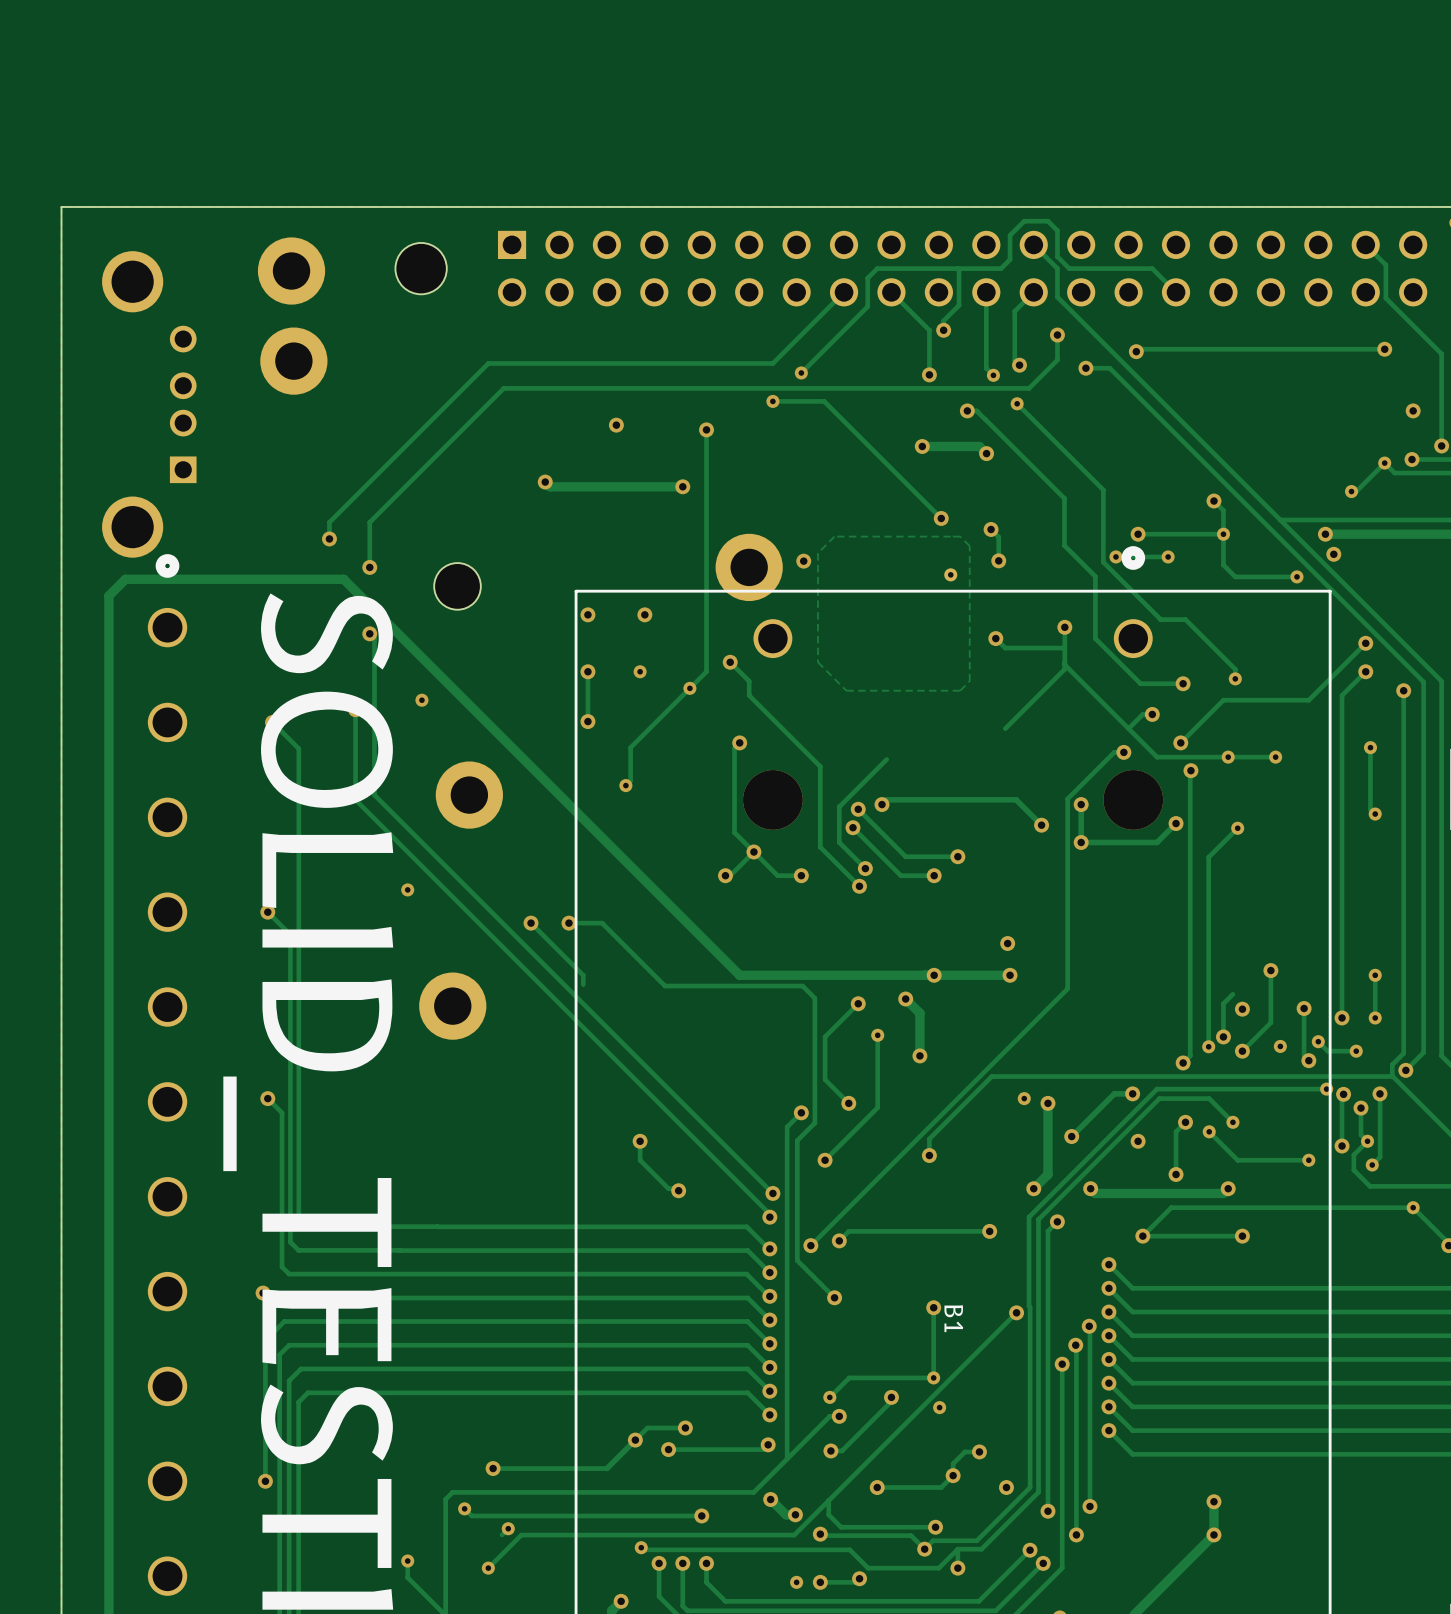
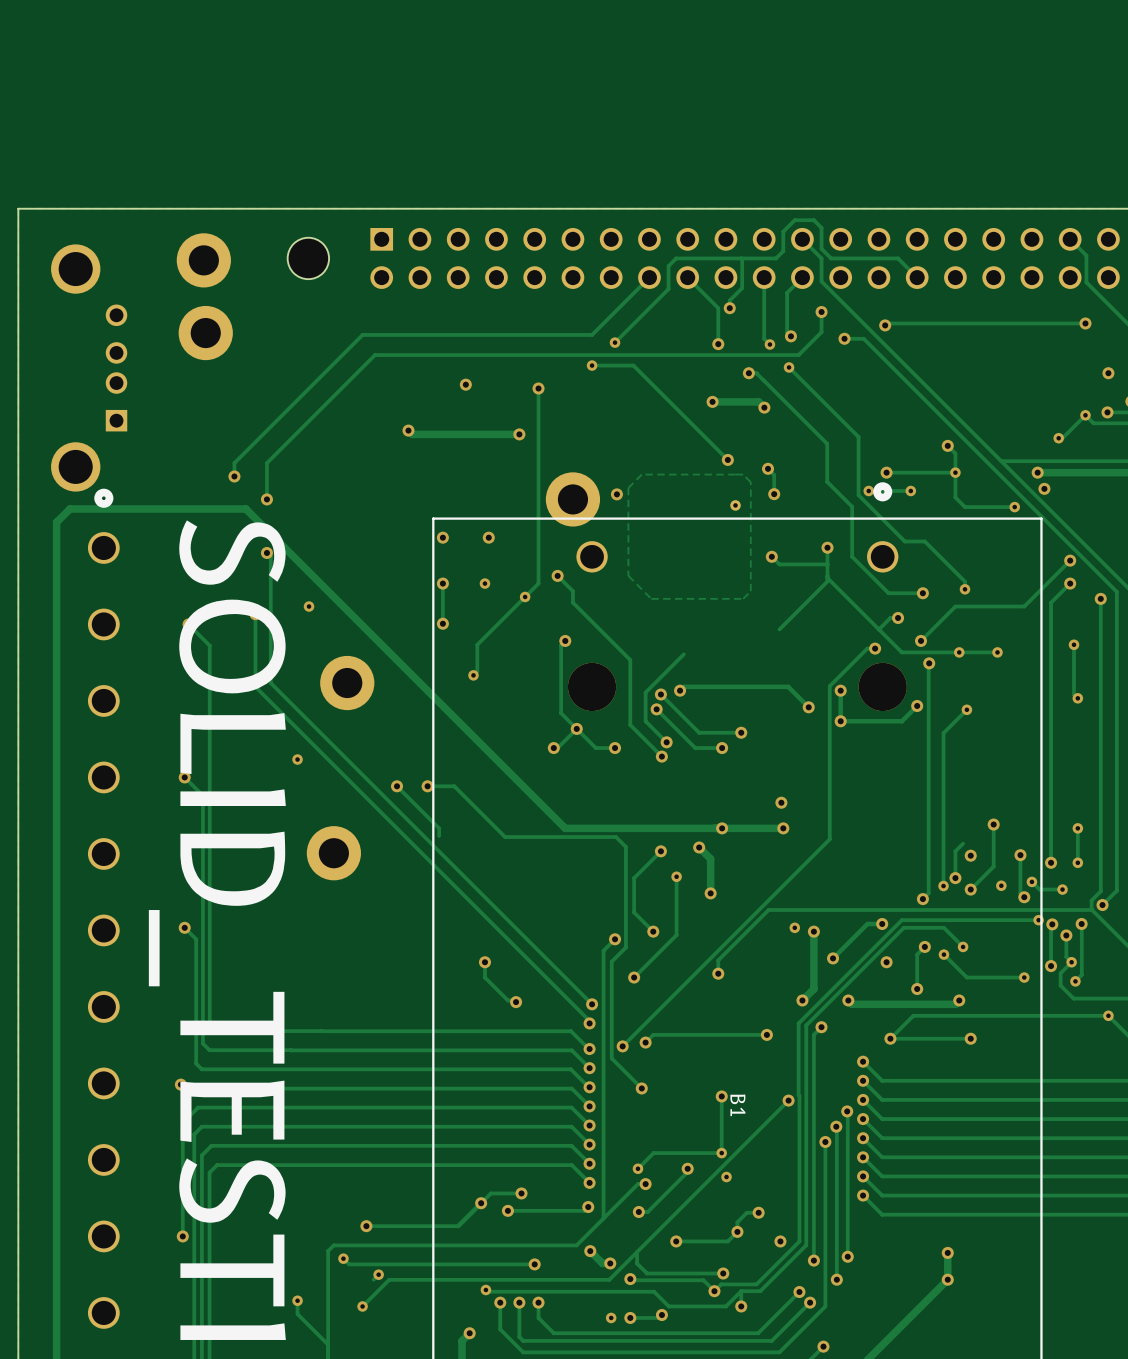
part: (457, 586) -> none

